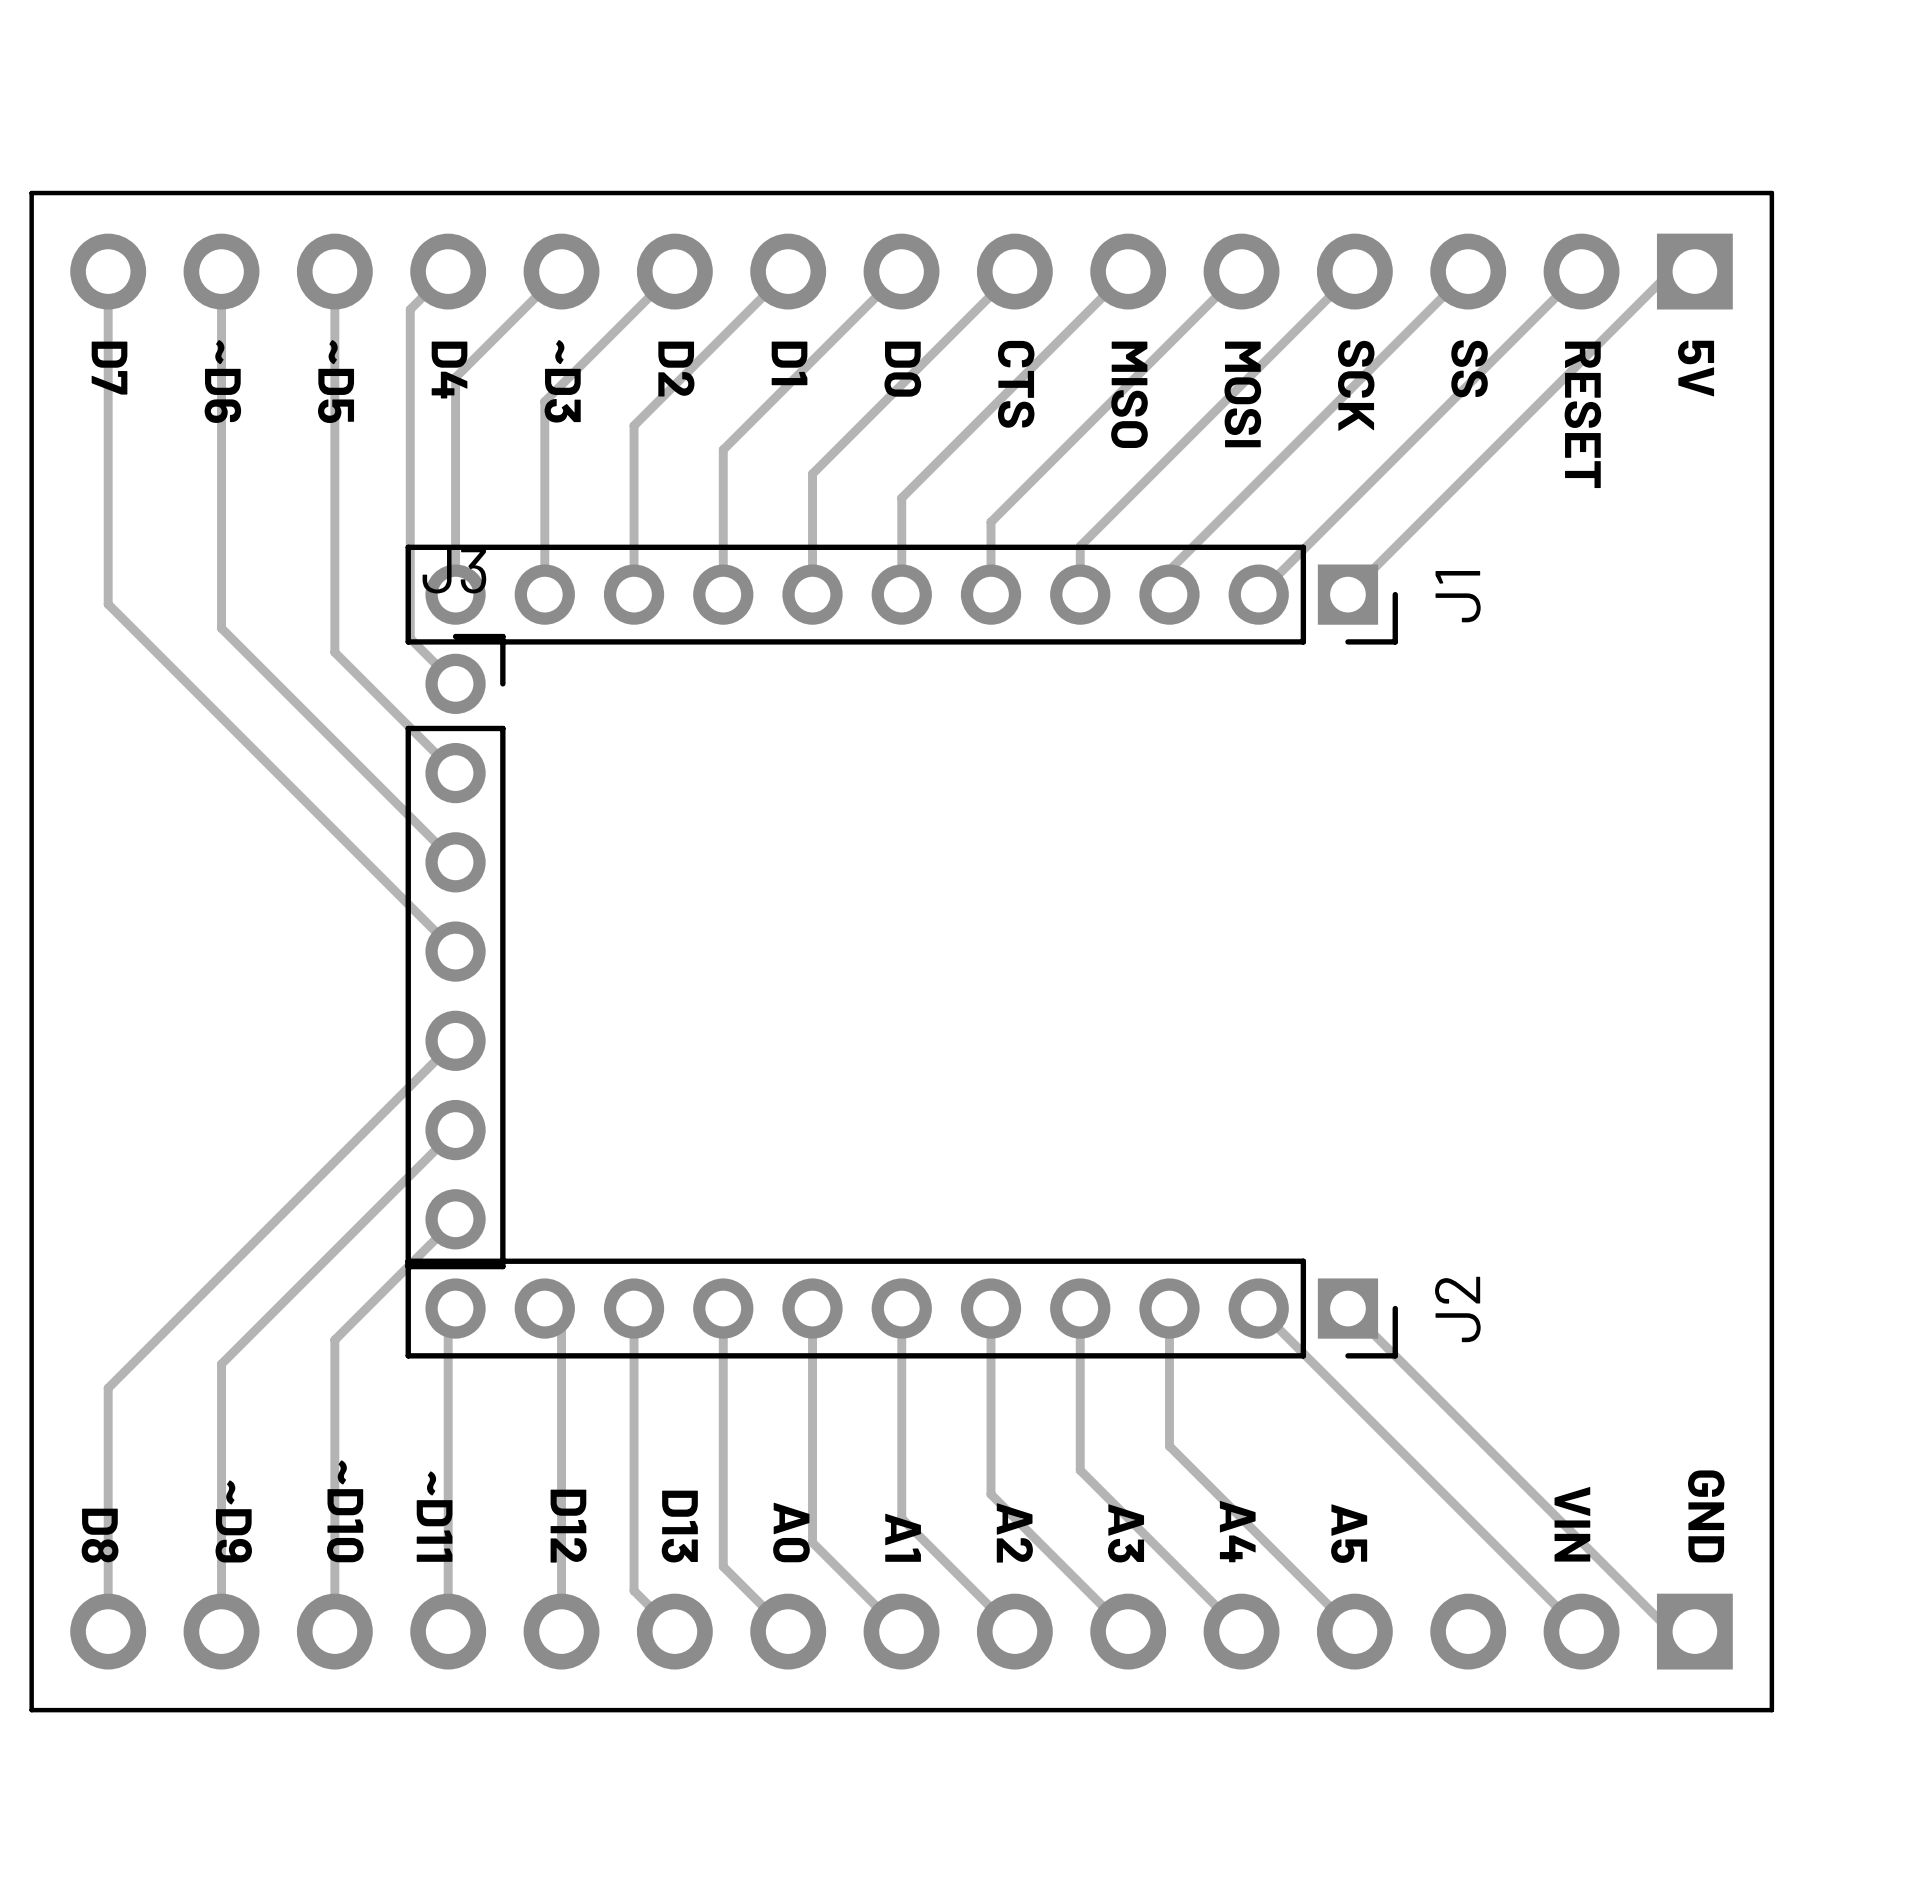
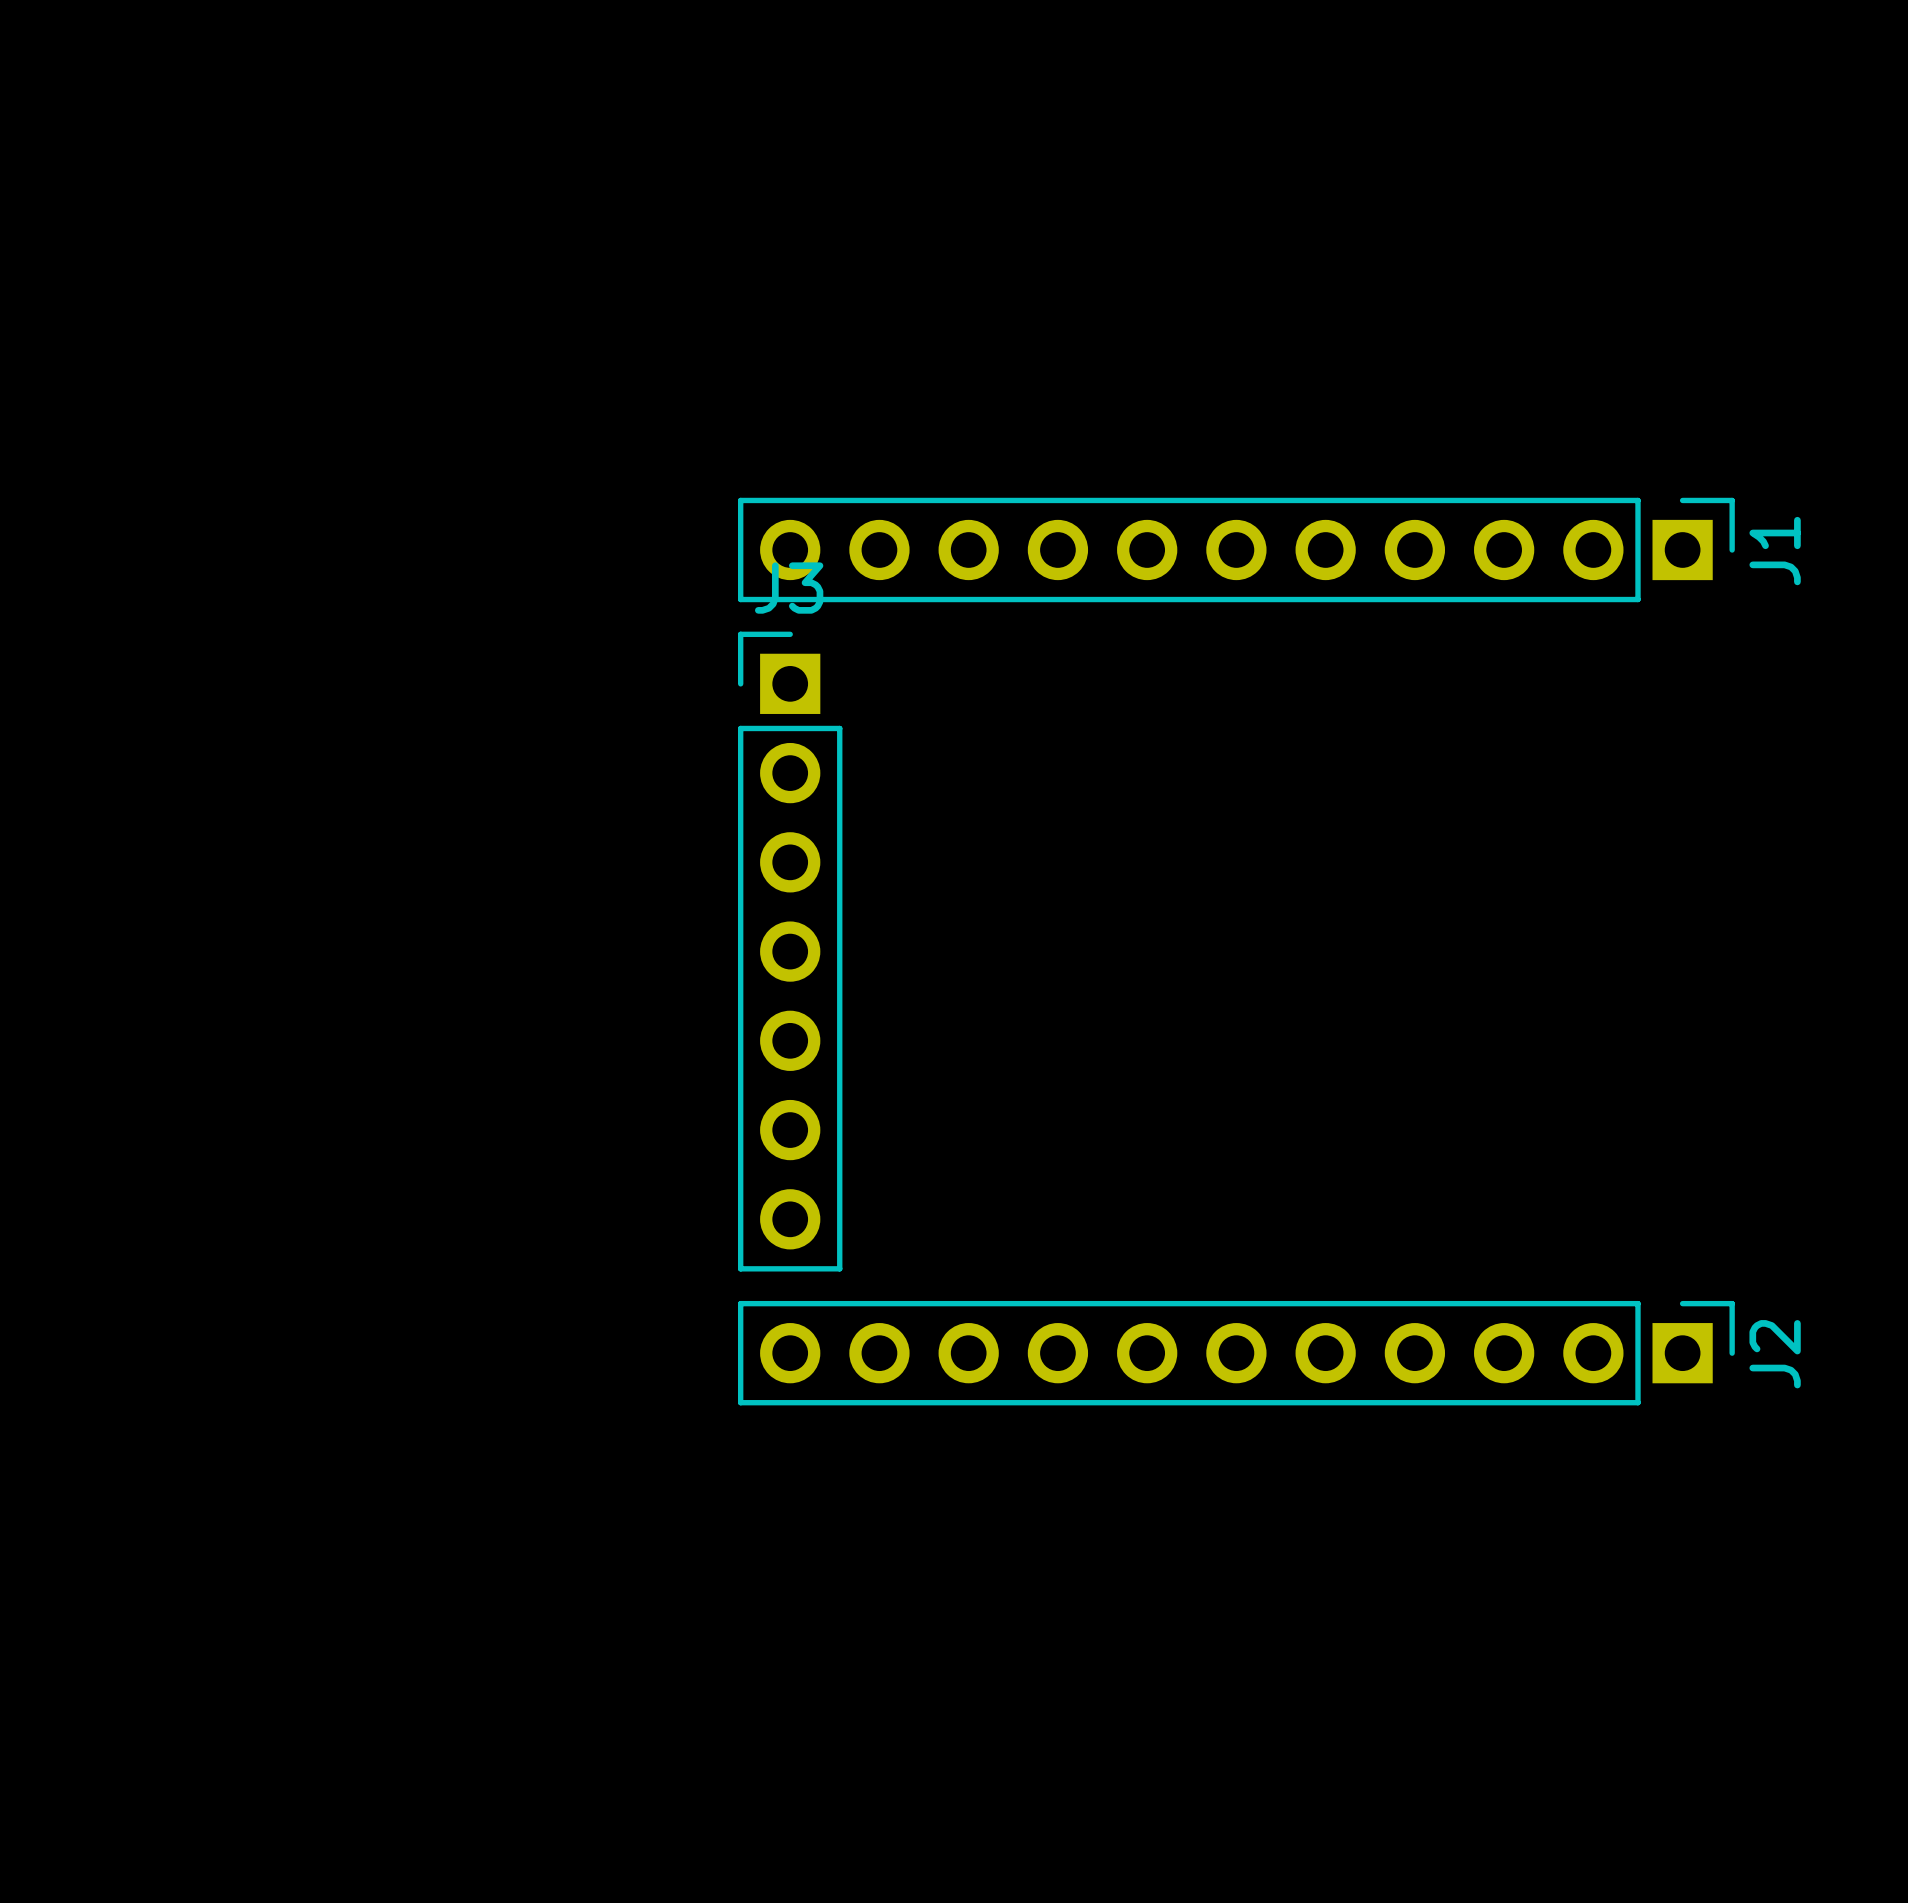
board edge: (31, 193) (1771, 193) (1771, 1710) (31, 1710) (31, 193) -> none
track: (108, 271) (108, 604) (455, 951) -> none
track: (221, 271) (221, 628) (455, 862) -> none
track: (334, 271) (334, 652) (455, 773) -> none
track: (448, 271) (410, 309) (410, 638) (455, 683) -> none
track: (561, 271) (455, 377) (455, 594) -> none
track: (674, 271) (544, 401) (544, 594) -> none
track: (788, 271) (634, 425) (634, 594) -> none
track: (901, 271) (723, 449) (723, 594) -> none
part: (901, 271) -> none
track: (1014, 271) (812, 473) (812, 594) -> none
track: (1128, 271) (901, 498) (901, 594) -> none
track: (1241, 271) (991, 522) (991, 594) -> none
track: (1354, 271) (1080, 546) (1080, 594) -> none
track: (1468, 271) (1169, 570) (1169, 594) -> none
track: (1581, 271) (1258, 594) -> none
track: (1694, 271) (1671, 271) (1347, 594) -> none
text: D1 (789, 363) -> none
text: D7 (109, 368) -> none
text: SS (1469, 368) -> none
text: 5V (1696, 368) -> none
text: D2 (676, 369) -> none
text: D0 (902, 369) -> none
text: D4 (449, 370) -> none
text: ~D6 (222, 381) -> none
text: ~D5 (336, 381) -> none
text: ~D3 (562, 381) -> none
text: CTS (1016, 384) -> none
text: SCK (1356, 385) -> none
text: MISO (1129, 394) -> none
text: MOSI (1242, 394) -> none
text: RESET (1582, 414) -> none
J1 footprint: [405, 544, 1398, 645] -> [738, 497, 1735, 603]
J3 footprint: [405, 633, 506, 1270] -> [738, 631, 843, 1272]
track: (455, 1040) (108, 1388) (108, 1631) -> none
track: (455, 1130) (221, 1364) (221, 1631) -> none
track: (455, 1219) (334, 1340) (334, 1631) -> none
J2 footprint: [405, 1258, 1398, 1359] -> [738, 1300, 1735, 1406]
track: (455, 1308) (448, 1315) (448, 1631) -> none
track: (544, 1308) (561, 1325) (561, 1631) -> none
track: (634, 1308) (634, 1590) (674, 1631) -> none
track: (723, 1308) (723, 1566) (788, 1631) -> none
track: (812, 1308) (812, 1542) (901, 1631) -> none
track: (901, 1308) (901, 1518) (1014, 1631) -> none
track: (991, 1308) (991, 1494) (1128, 1631) -> none
track: (1080, 1308) (1080, 1470) (1241, 1631) -> none
track: (1169, 1308) (1169, 1446) (1354, 1631) -> none
track: (1258, 1308) (1581, 1631) -> none
track: (1347, 1308) (1671, 1631) (1694, 1631) -> none
text: ~D10 (345, 1511) -> none
text: ~D11 (434, 1516) -> none
text: GND (1706, 1516) -> none
text: ~D9 (233, 1521) -> none
text: VIN (1572, 1524) -> none
text: D12 (568, 1526) -> none
text: D13 (679, 1526) -> none
text: A4 (1237, 1531) -> none
text: A0 (791, 1532) -> none
text: A2 (1014, 1532) -> none
text: A3 (1125, 1533) -> none
text: A5 (1349, 1533) -> none
text: D8 (100, 1535) -> none
text: A1 (903, 1537) -> none
part: (901, 1631) -> none

